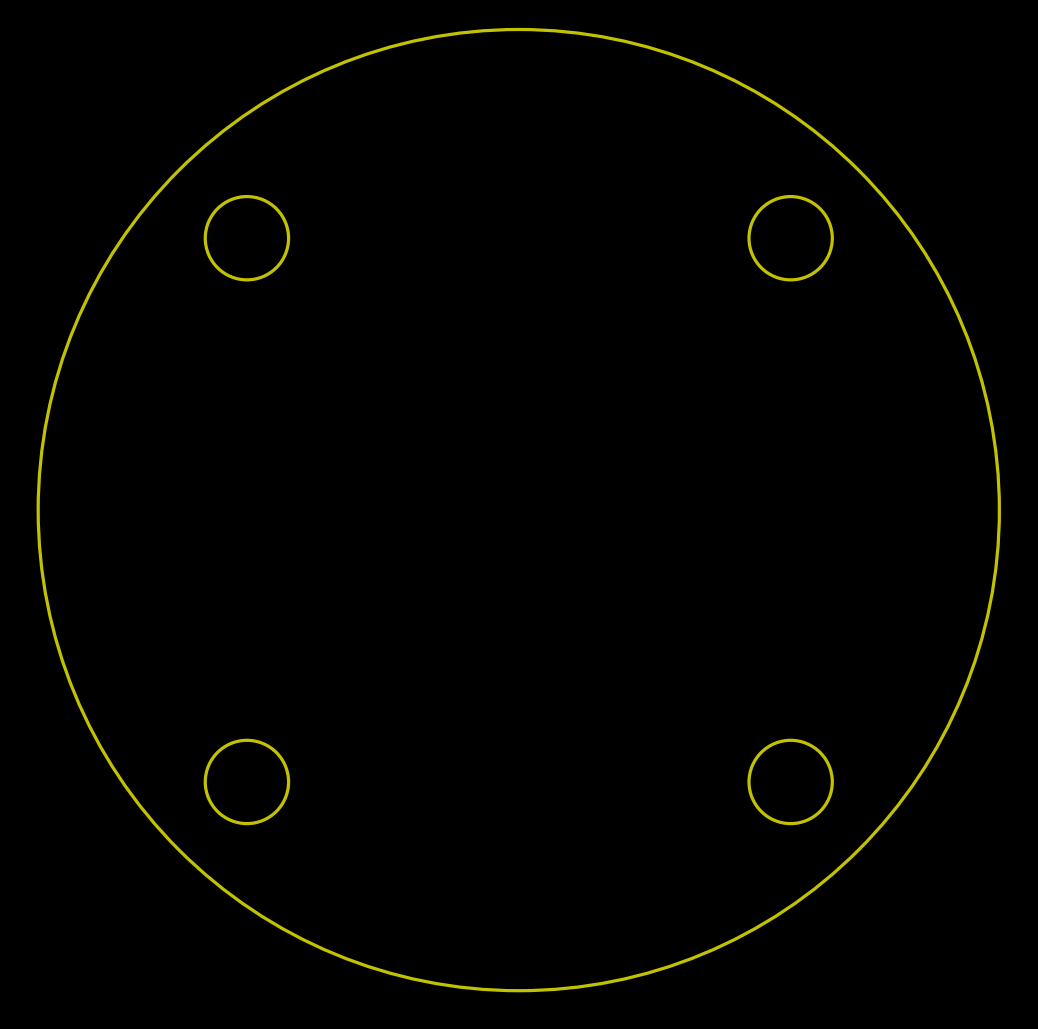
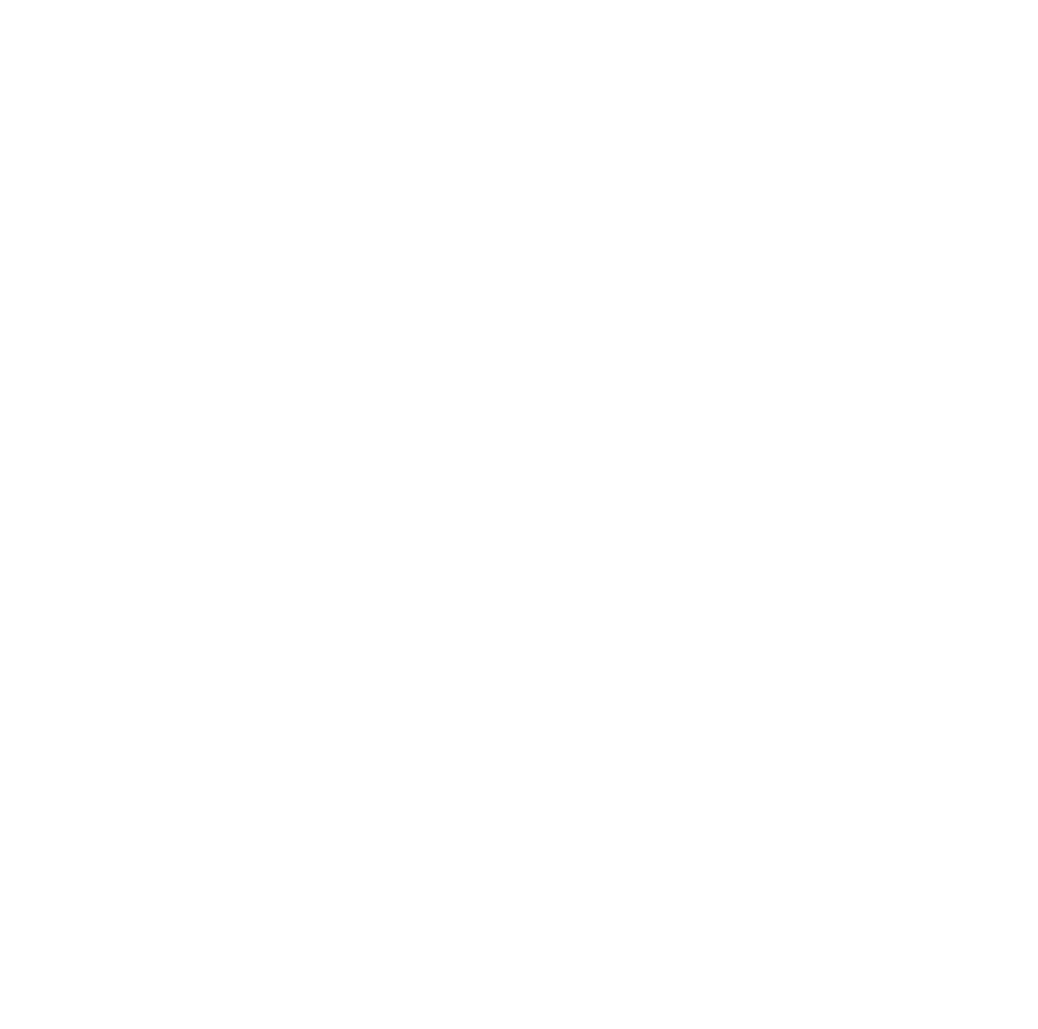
round board edge: [36, 27, 1001, 993] -> none
round board edge: [203, 194, 291, 282] -> none
round board edge: [747, 194, 834, 282] -> none
round board edge: [203, 738, 291, 826] -> none
round board edge: [747, 738, 834, 826] -> none

